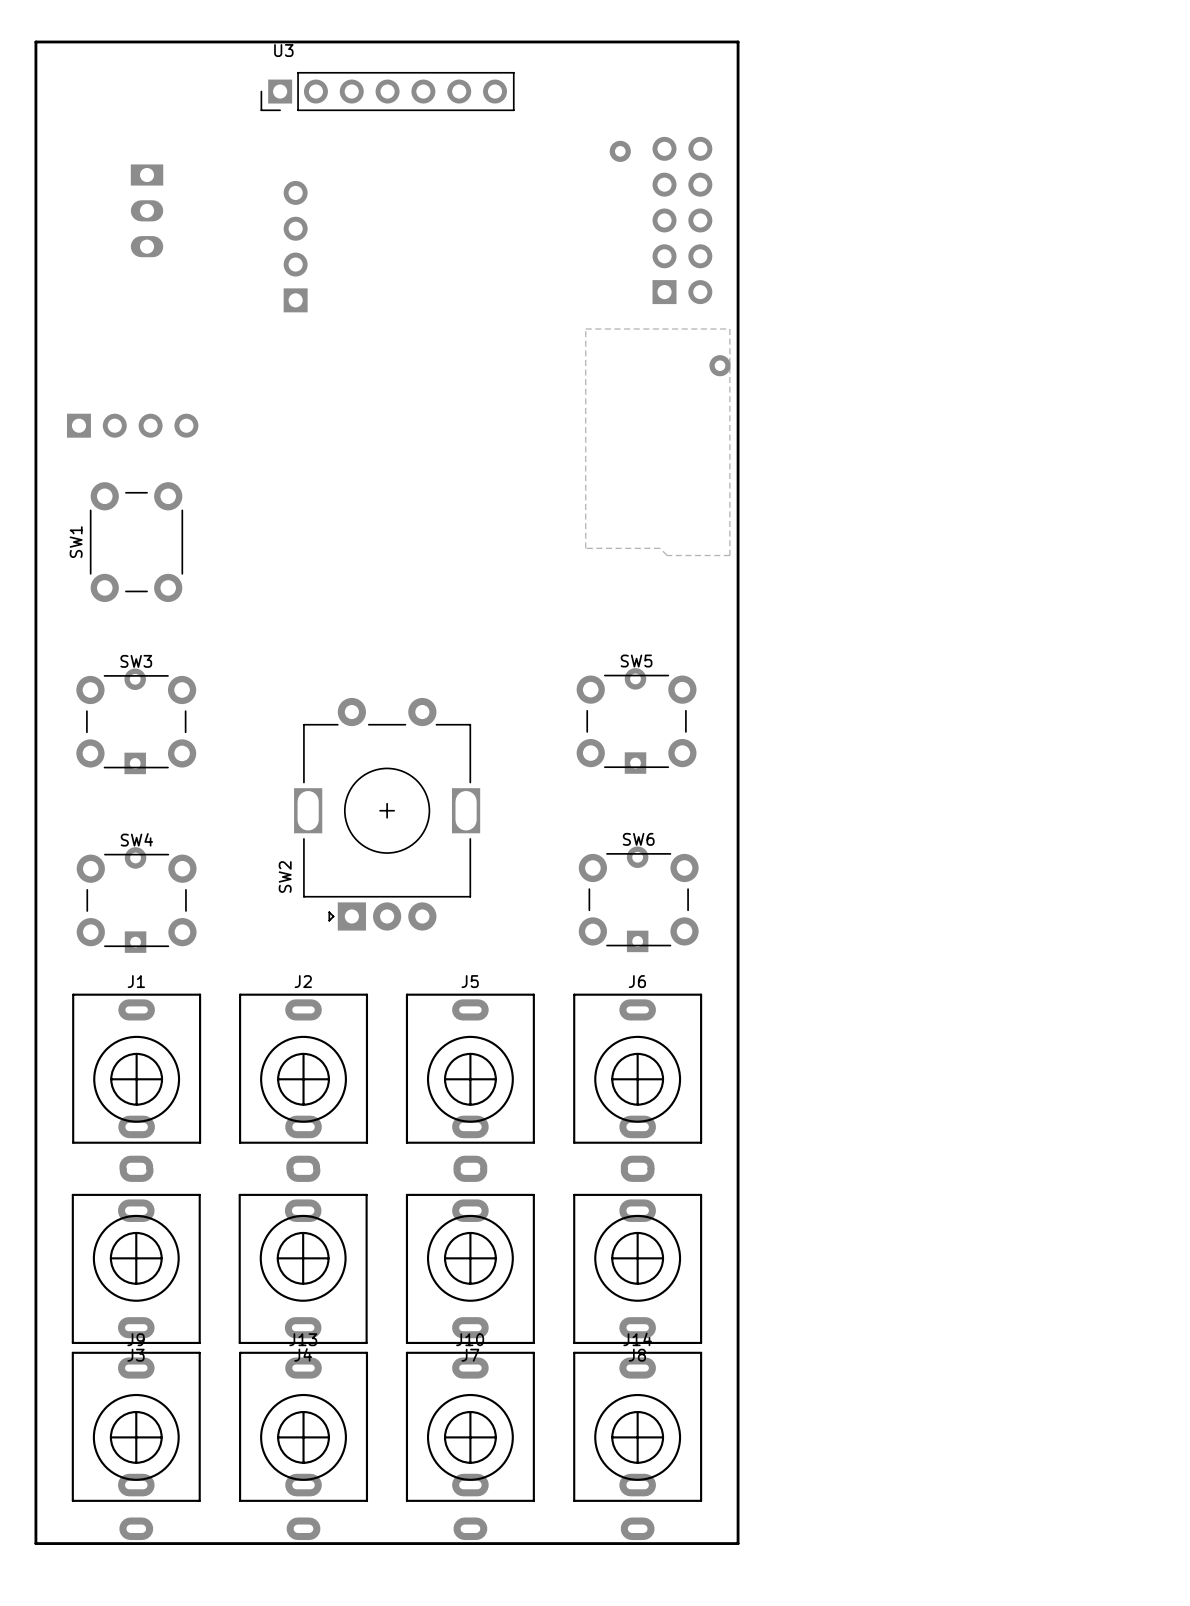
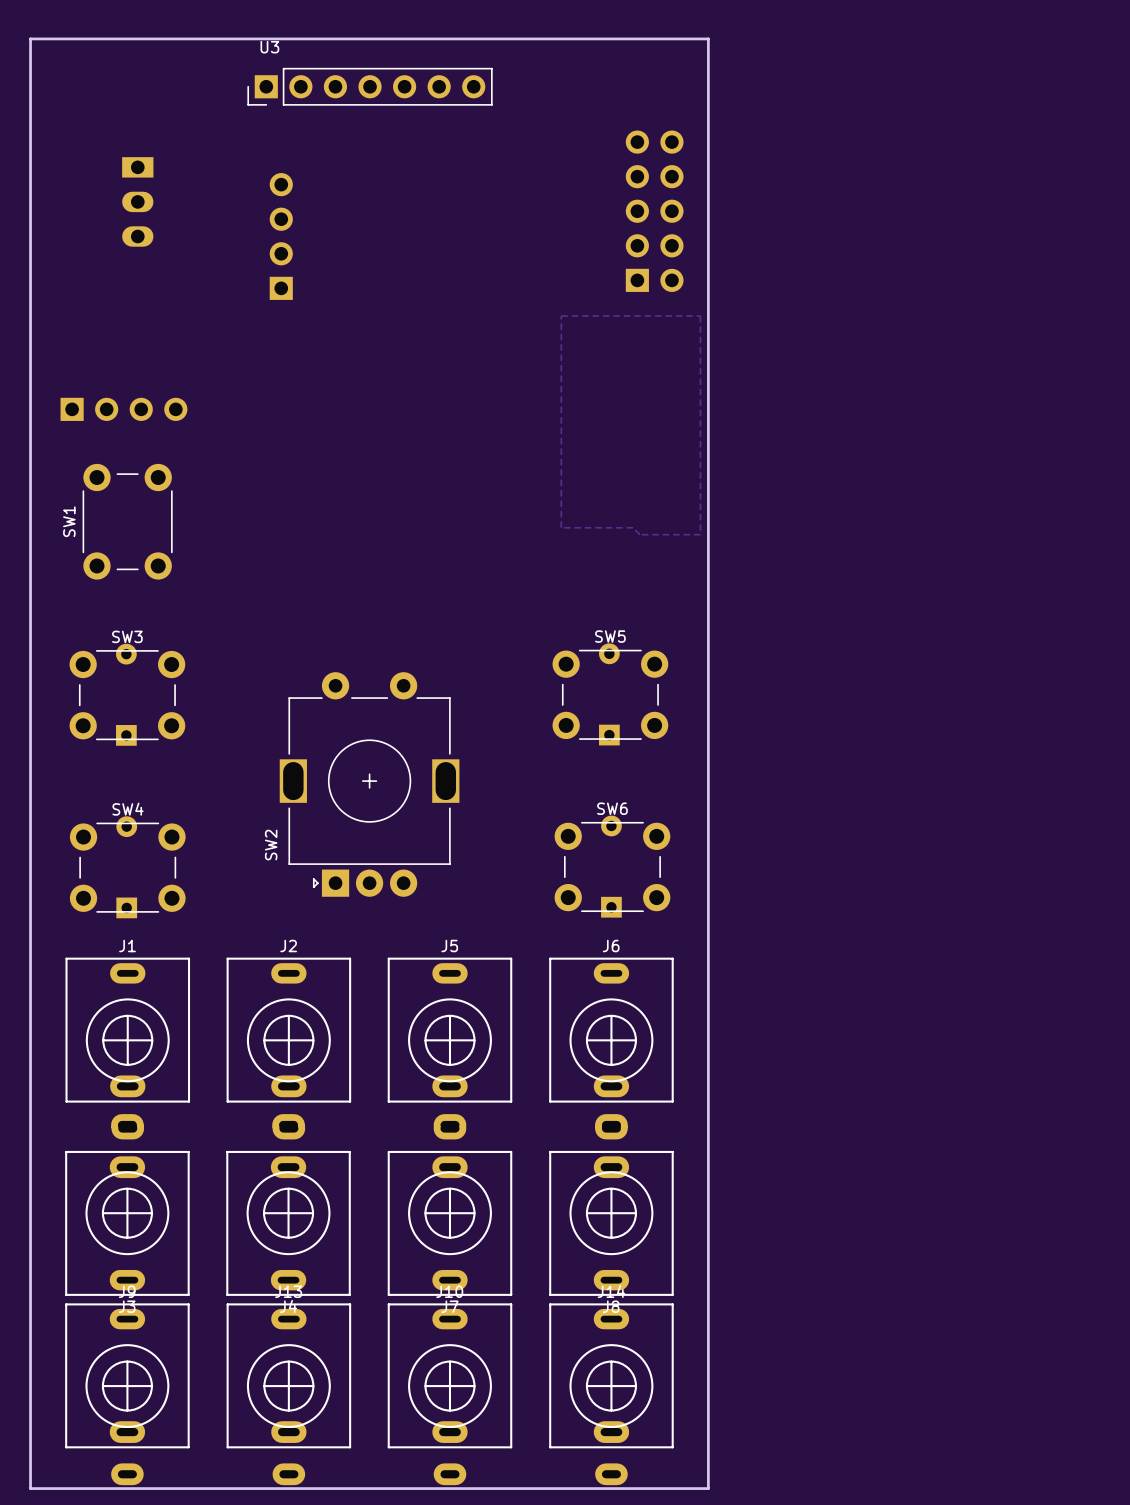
via: (620, 151) -> none
via: (720, 365) -> none

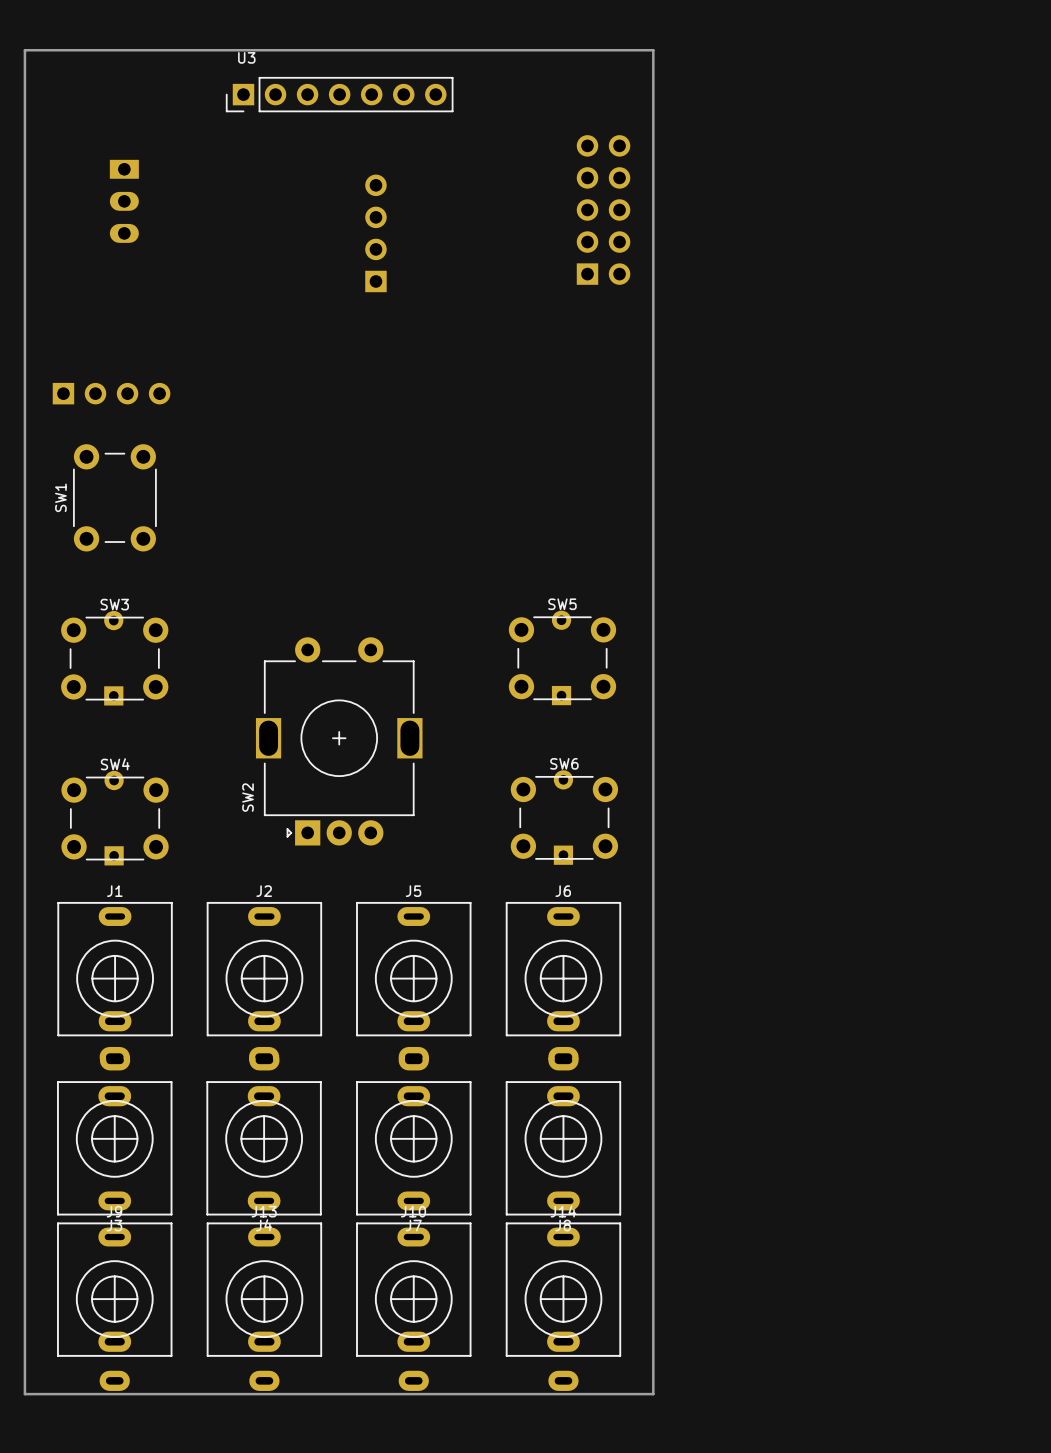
part position: (281, 236) -> (375, 233)
zone outline: (561, 316) (561, 527) (633, 527) (639, 534) (700, 534) (700, 316) (561, 316) -> none

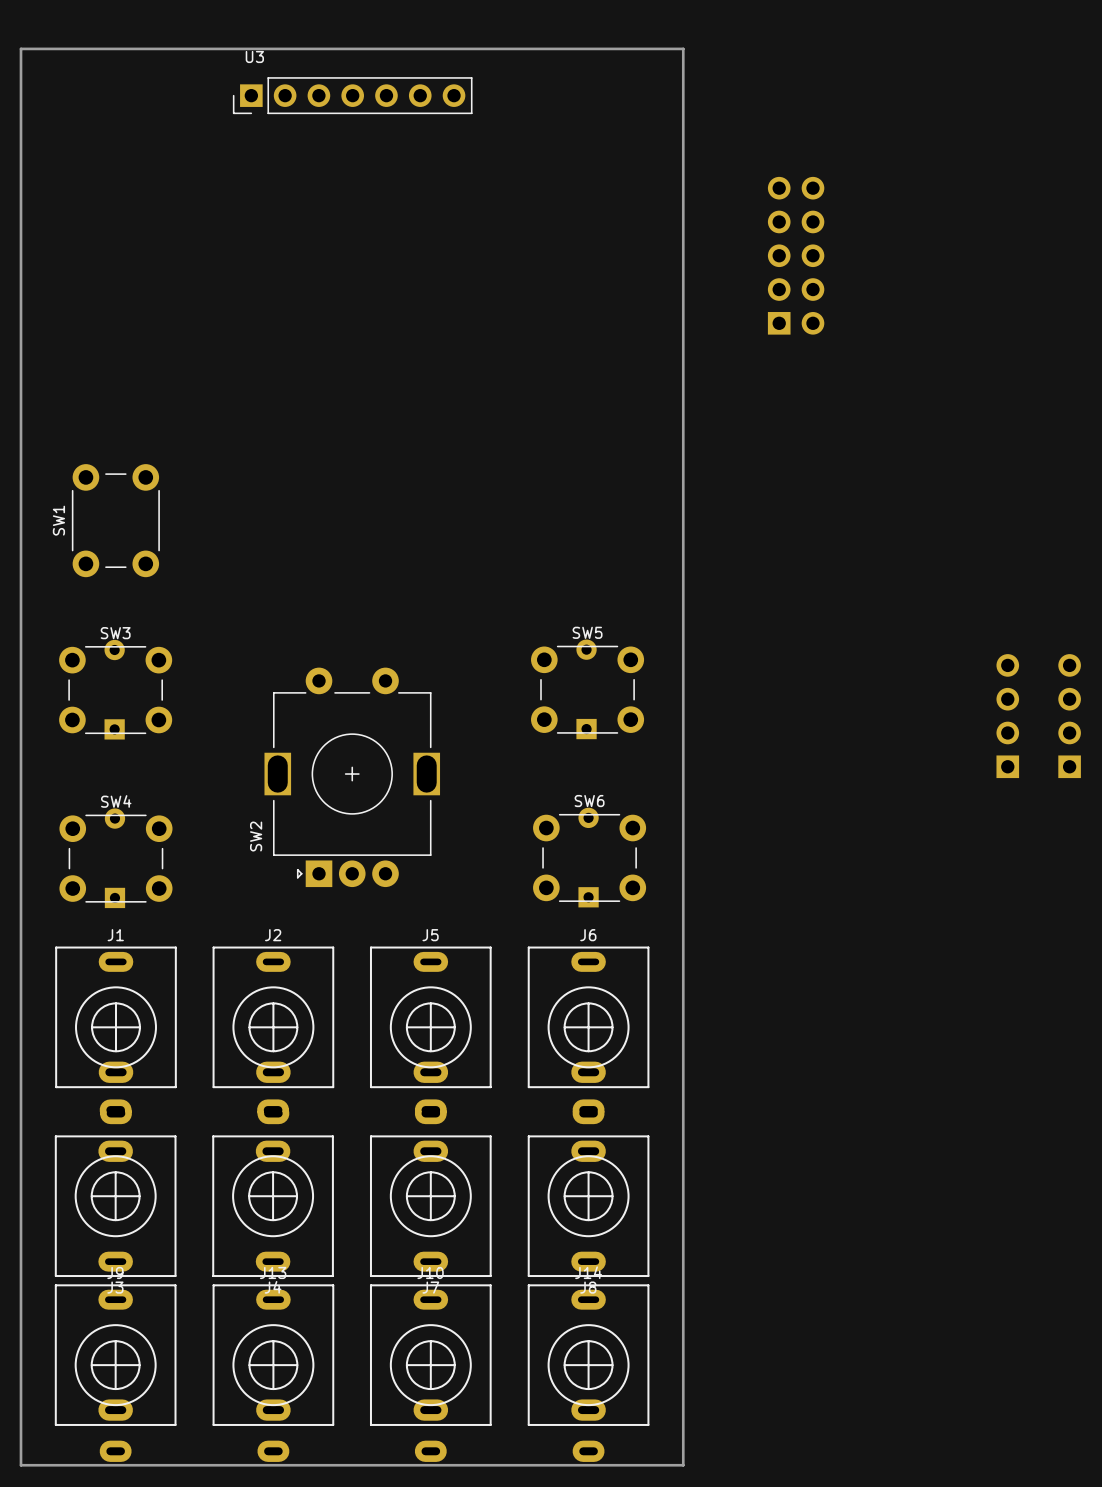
part: (124, 201) -> none
part position: (603, 209) -> (796, 255)
part: (375, 233) -> none
part: (111, 393) -> none
part: none -> (1007, 716)
part: none -> (1069, 716)

